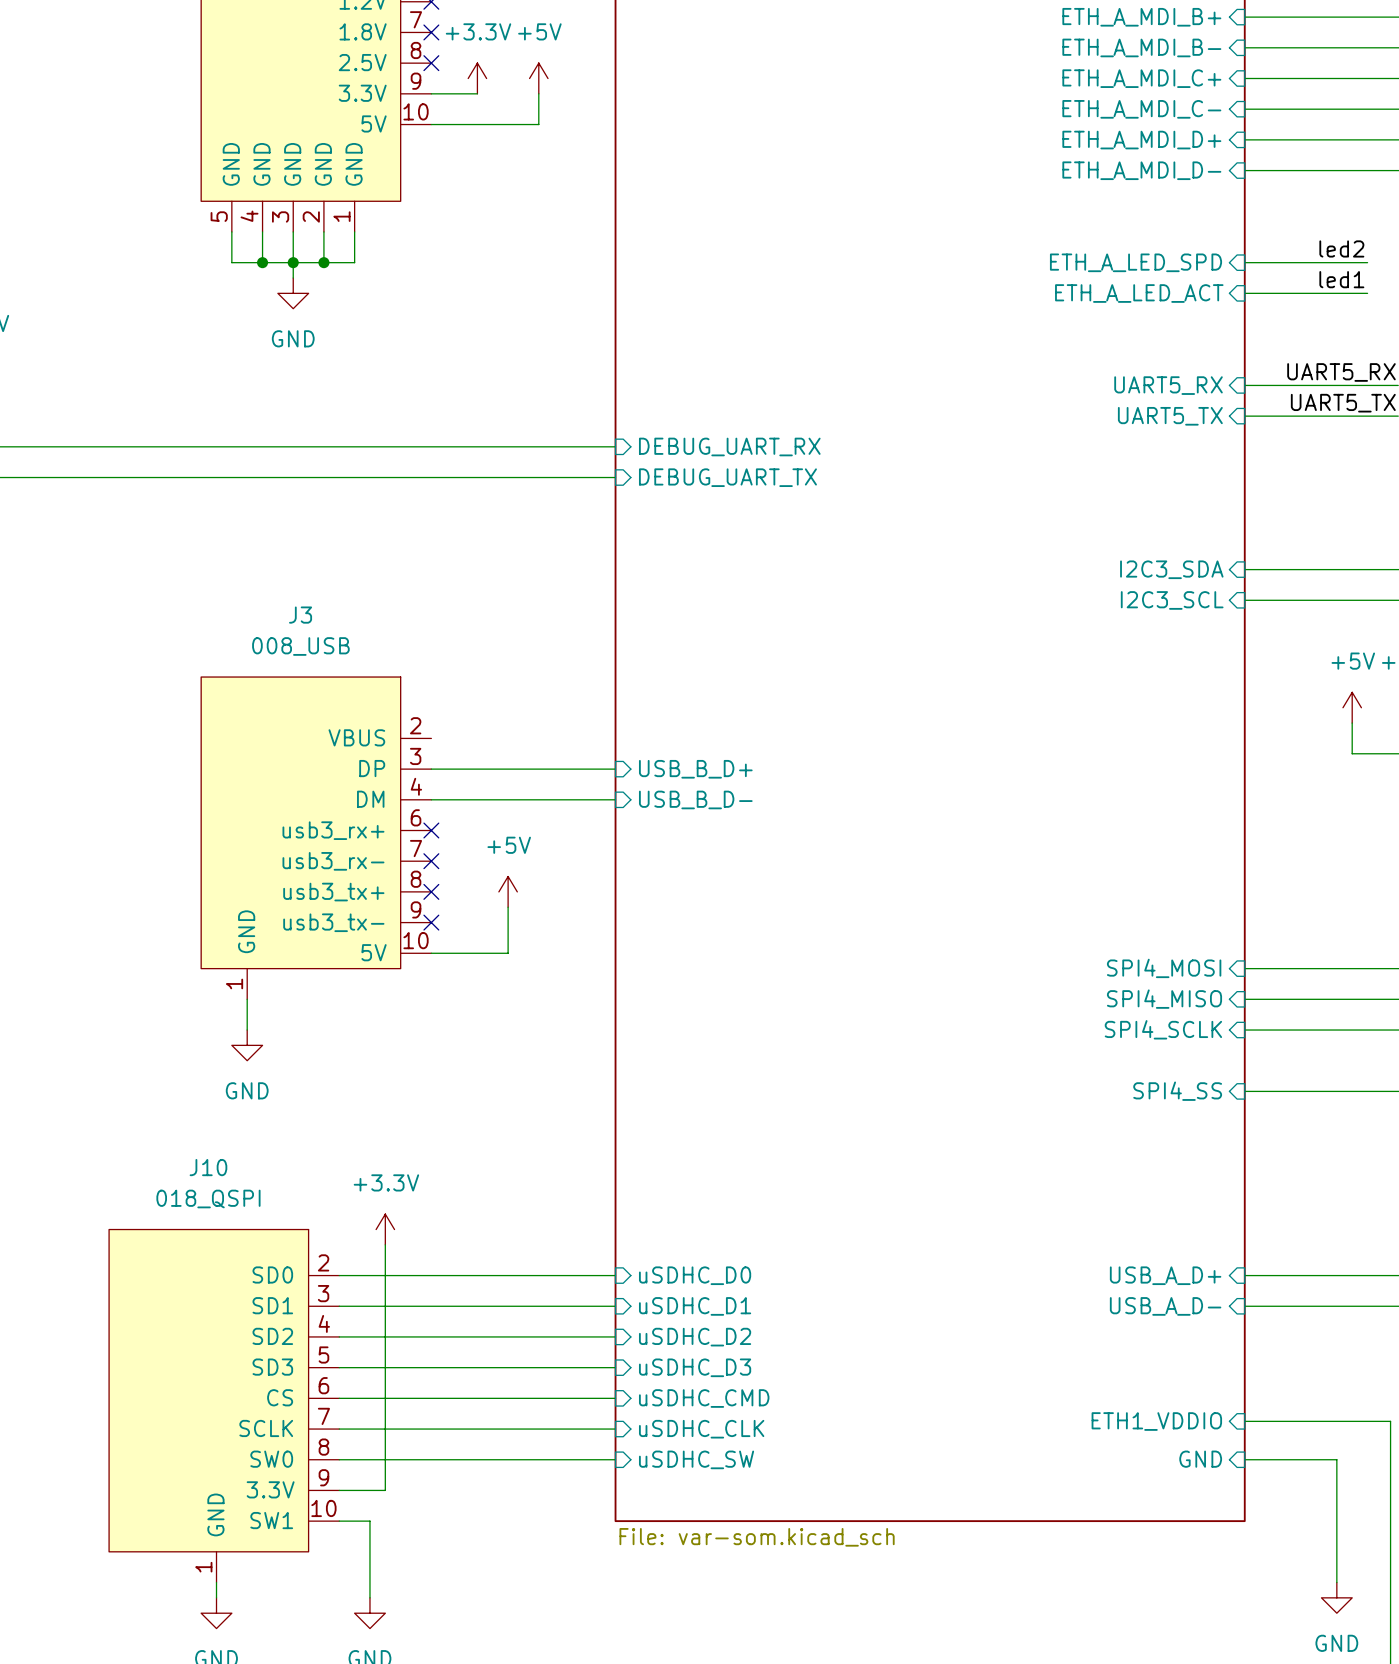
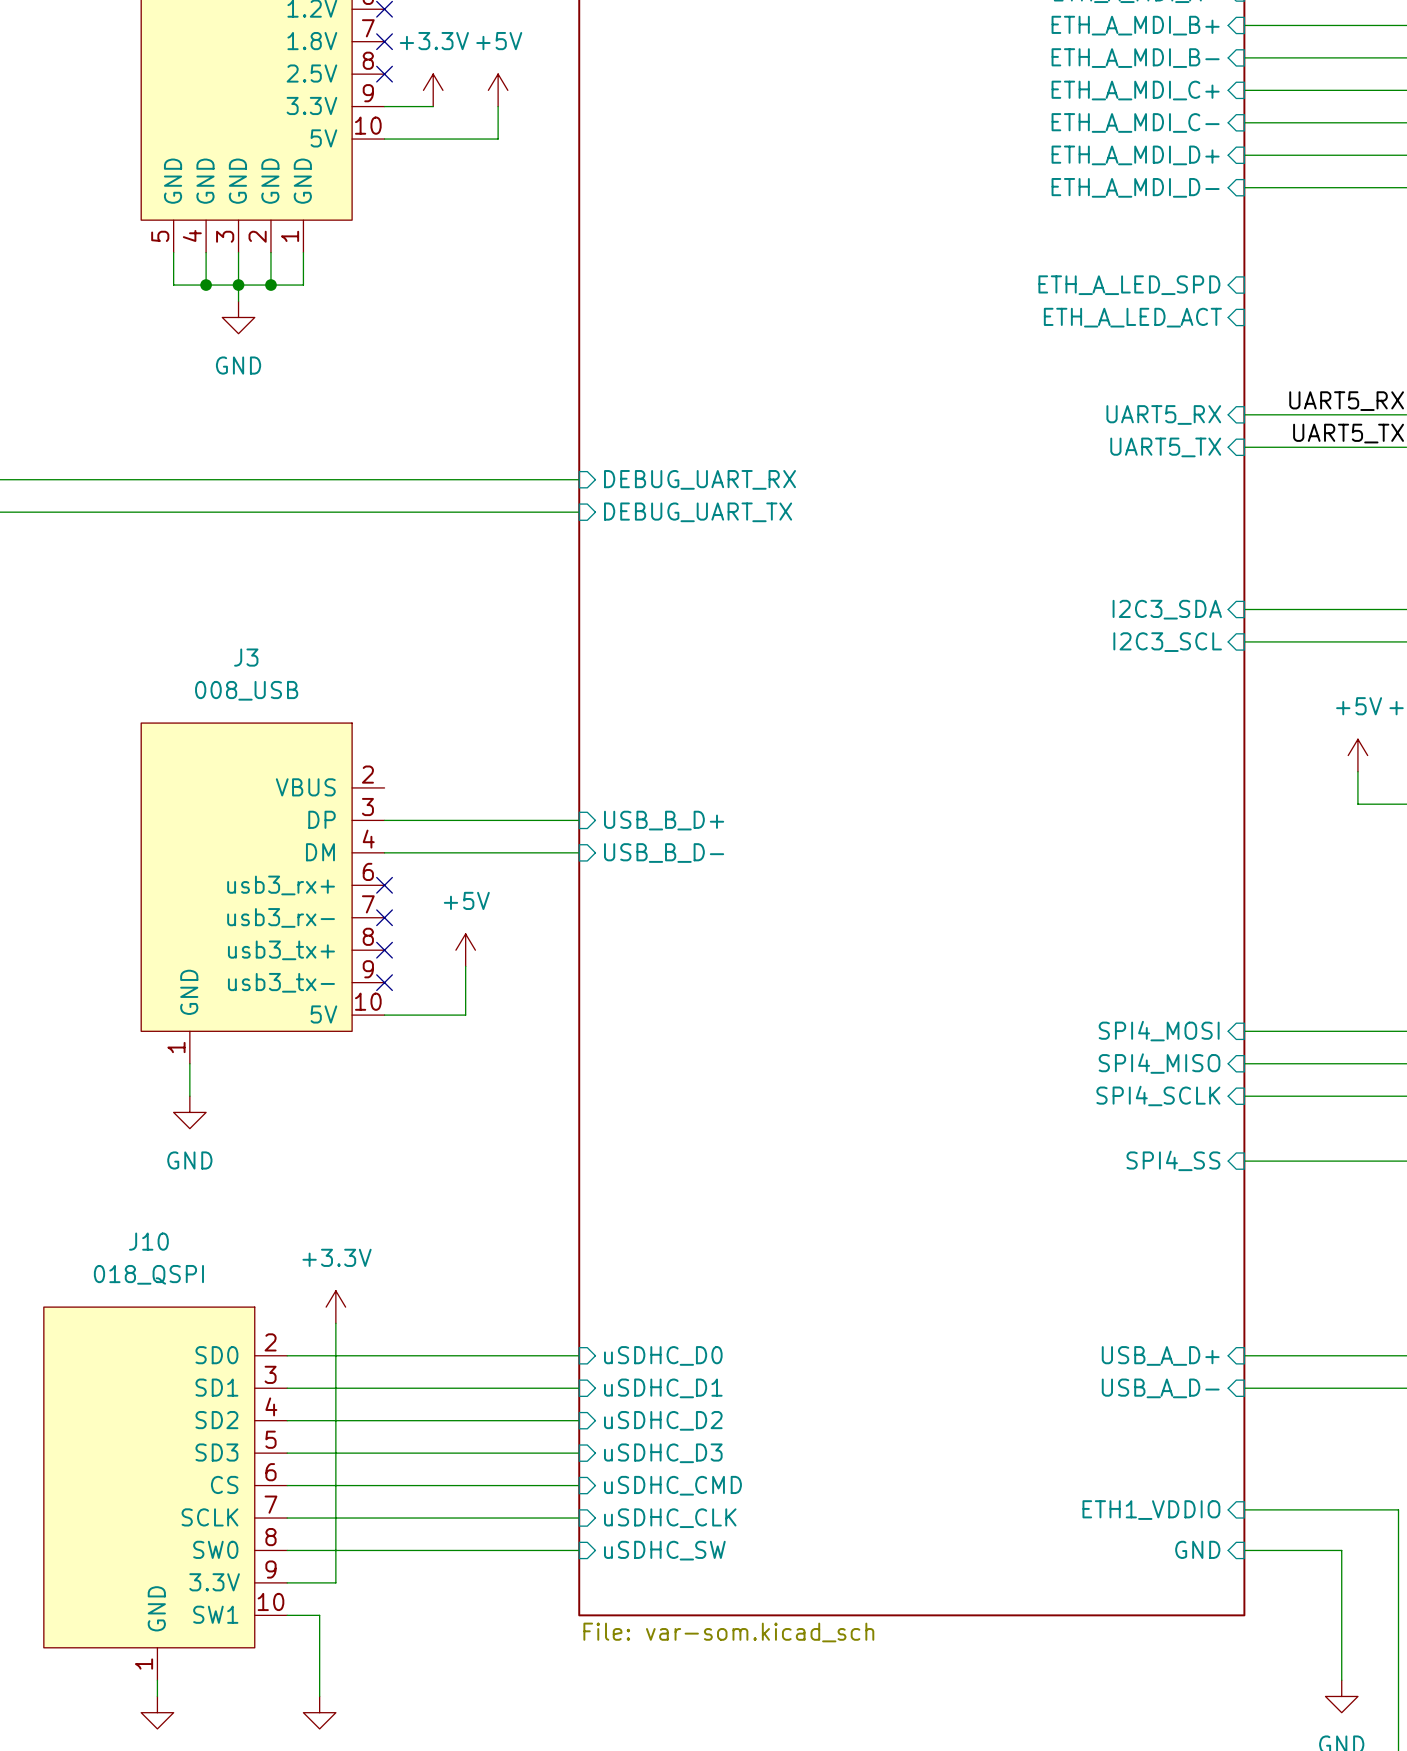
label: led2 (1341, 248) -> none
wire: (1244, 262) (1367, 262) -> none
label: led1 (1341, 279) -> none
wire: (1244, 293) (1367, 293) -> none

